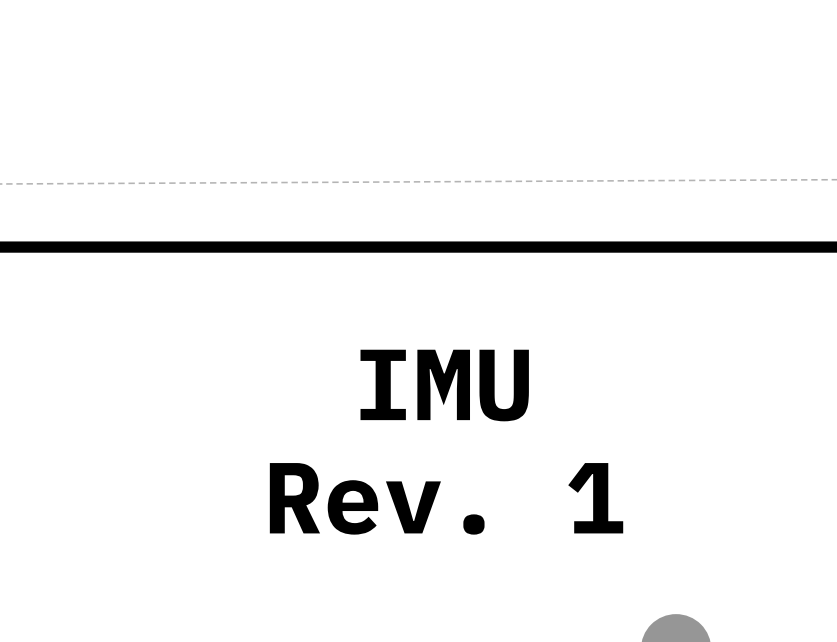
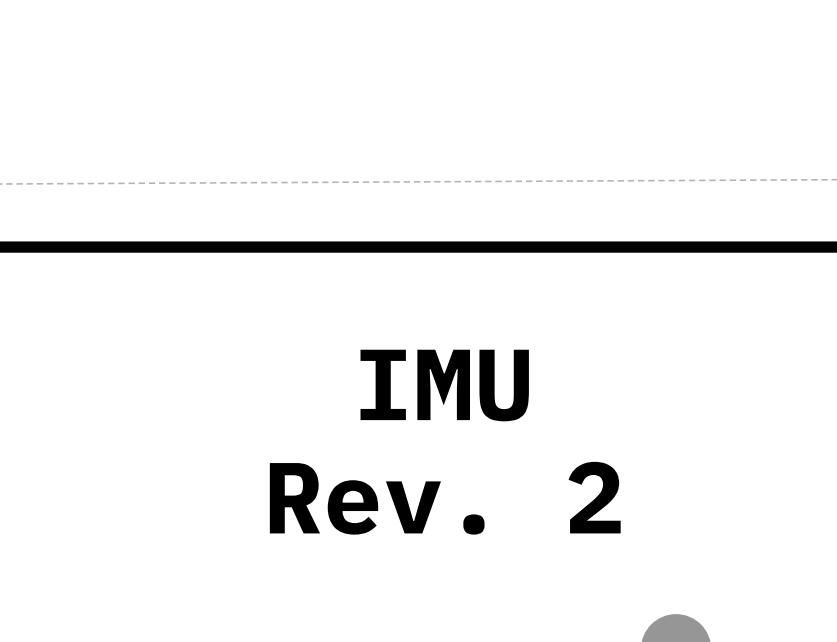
text: Rev. 1 (446, 498) -> Rev. 2 (445, 498)

